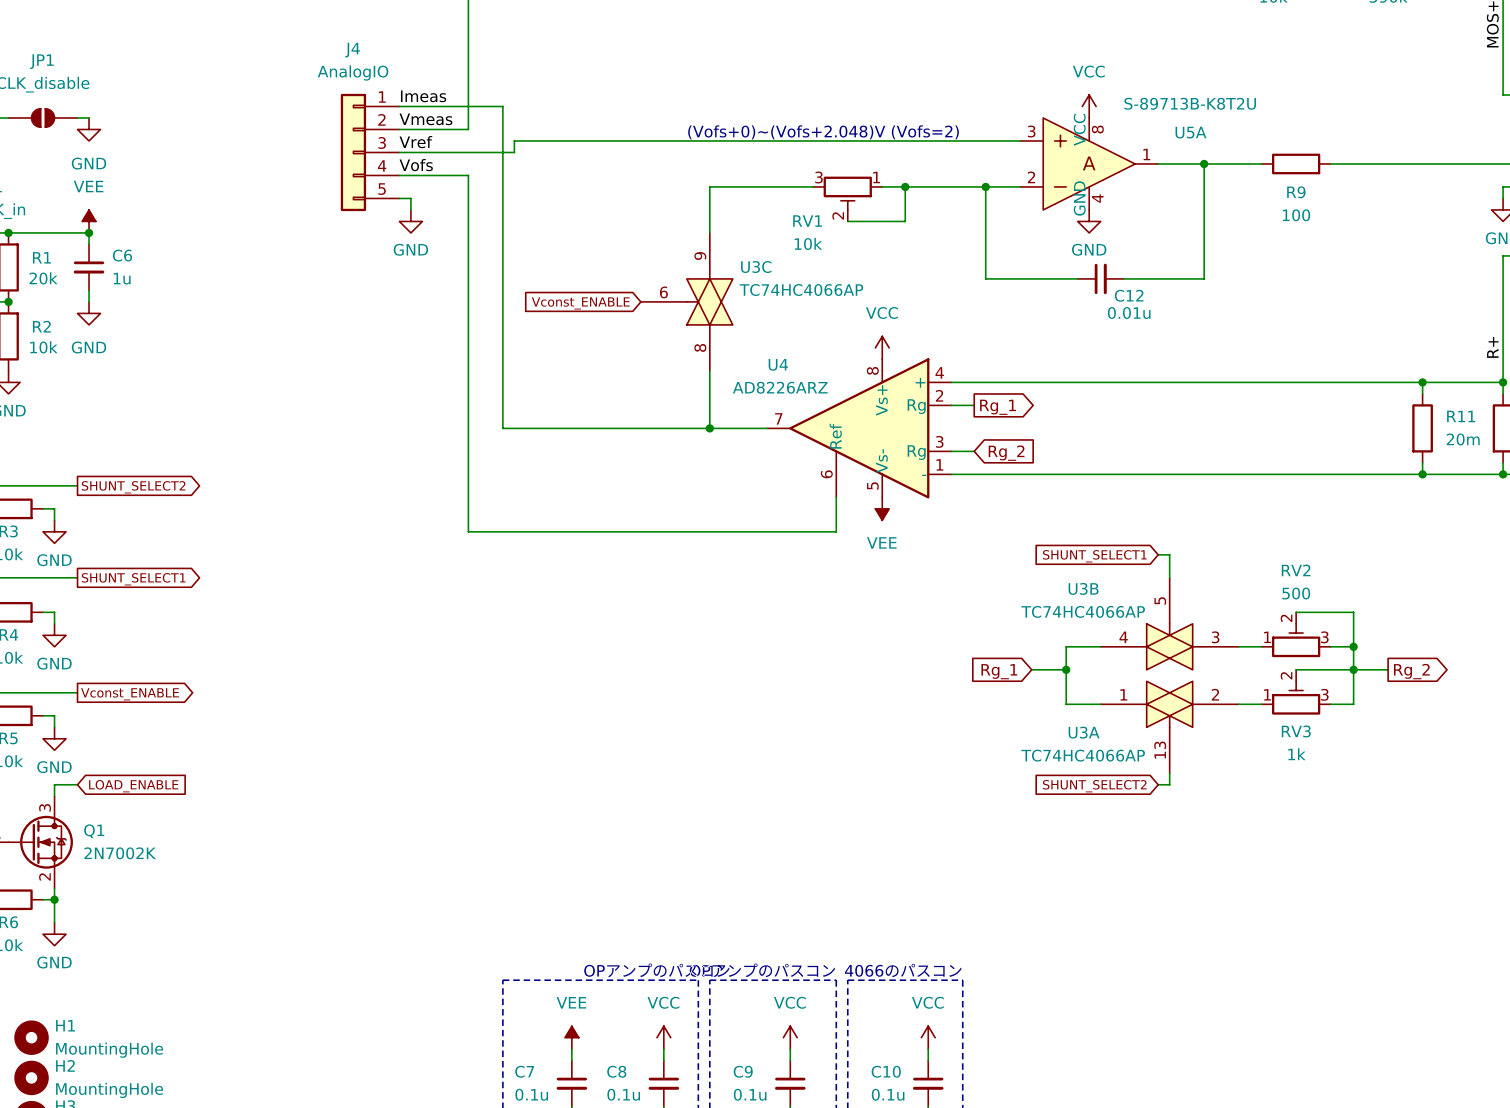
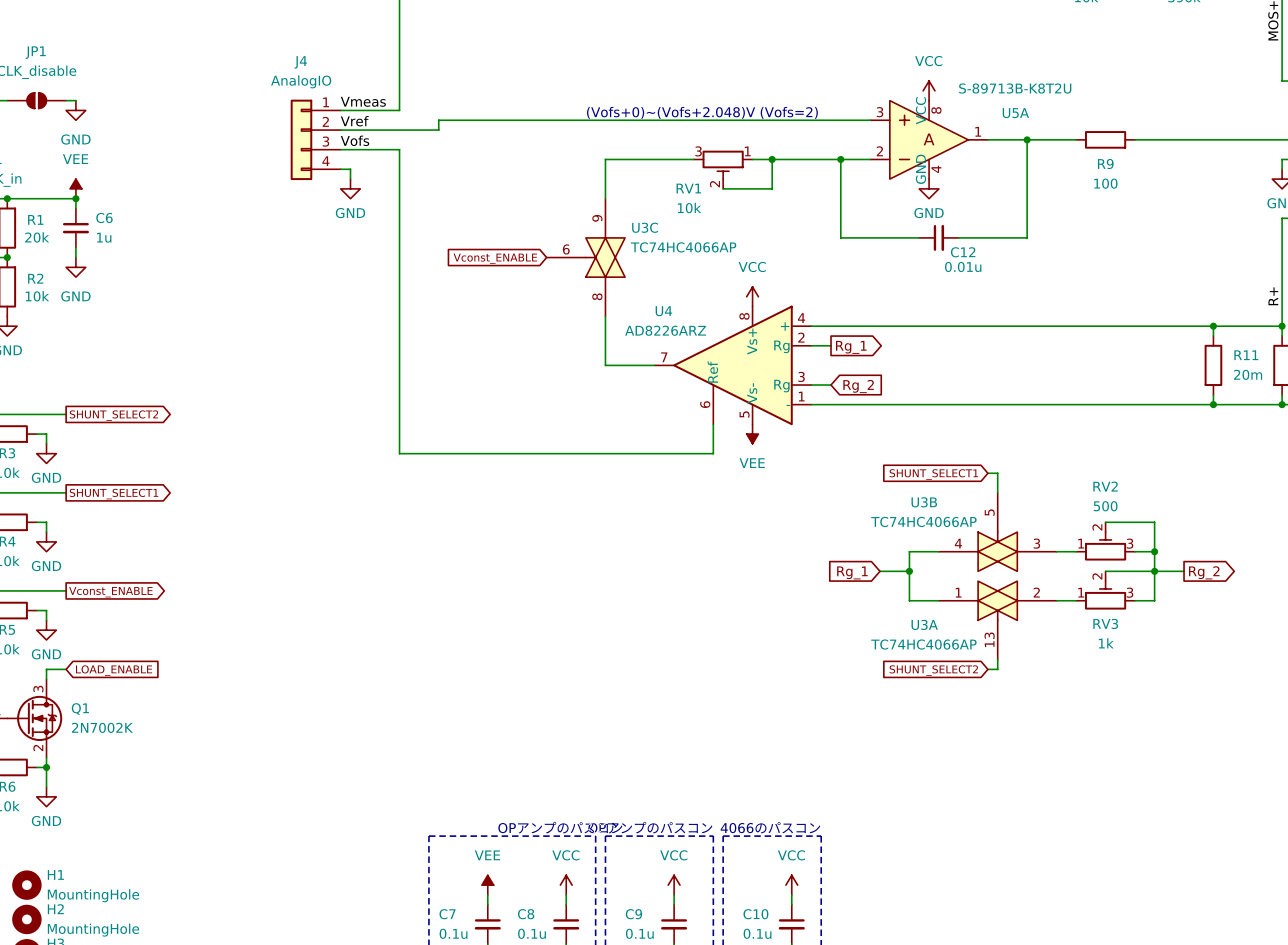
J4 symbol: [340, 93, 400, 212] -> [290, 99, 341, 181]
label: Imeas (423, 96) -> none
wire: (399, 106) (502, 106) (502, 428) (709, 428) -> none
junction: (709, 428) -> none

